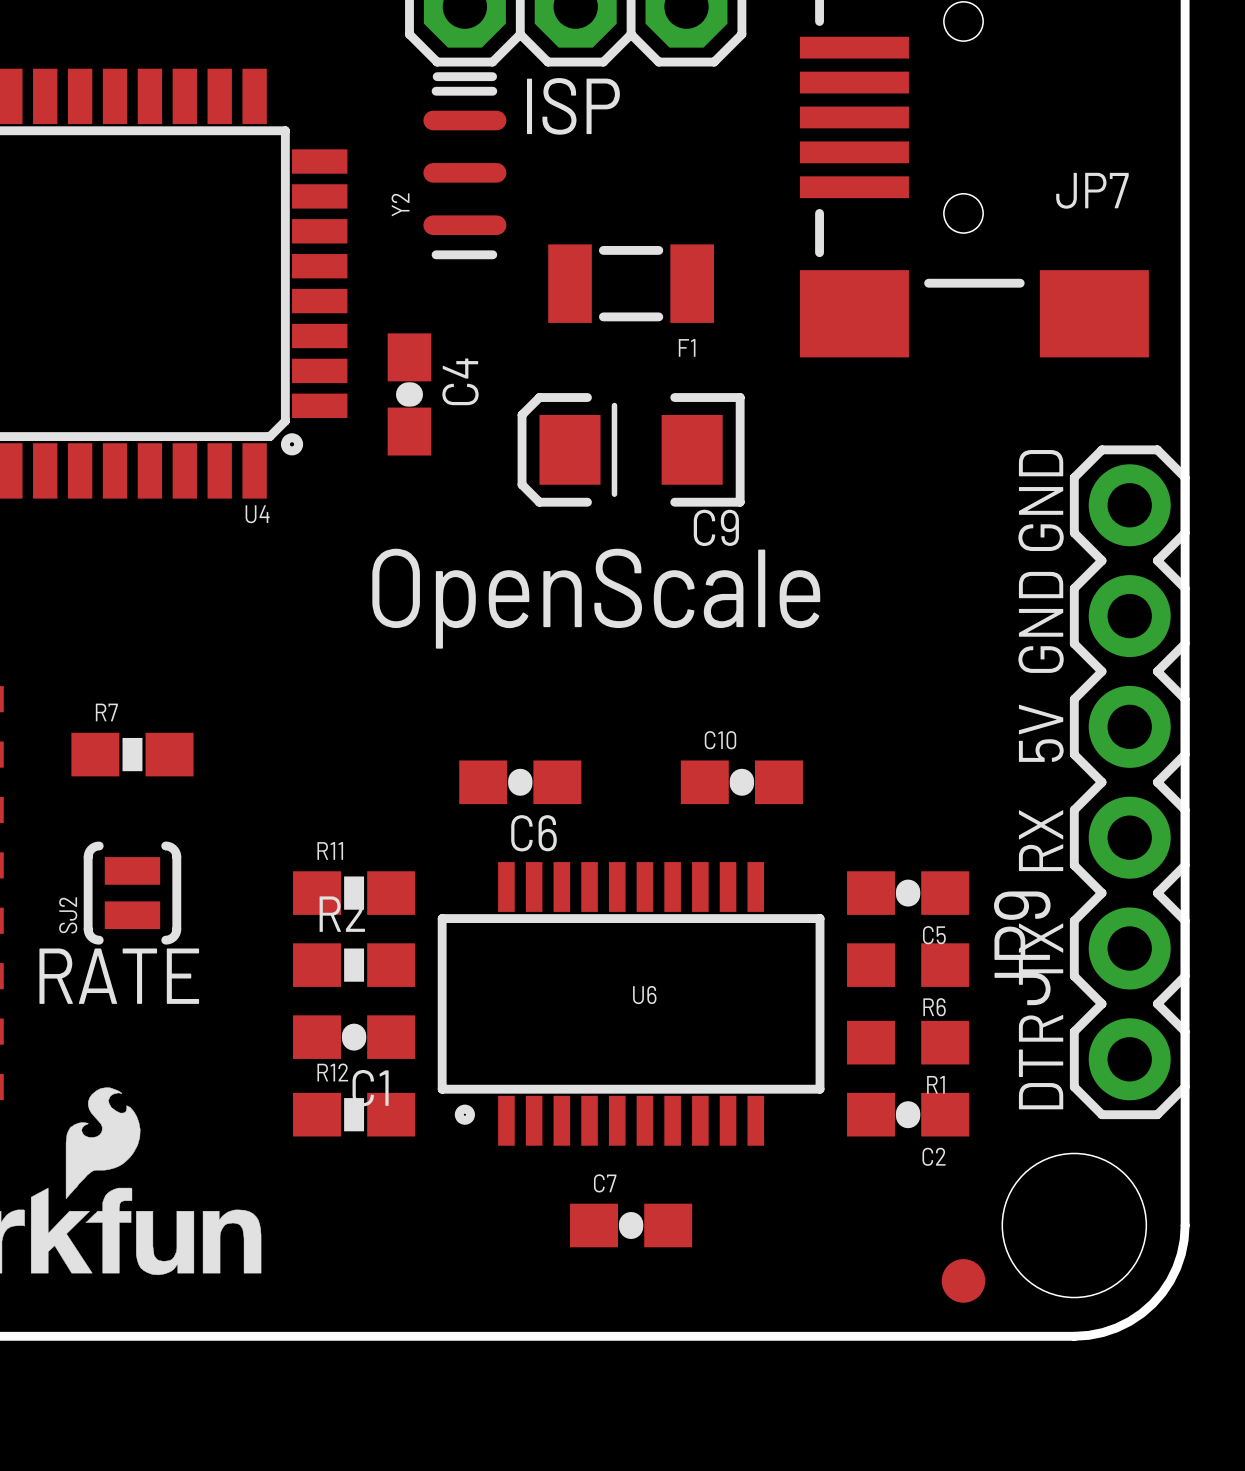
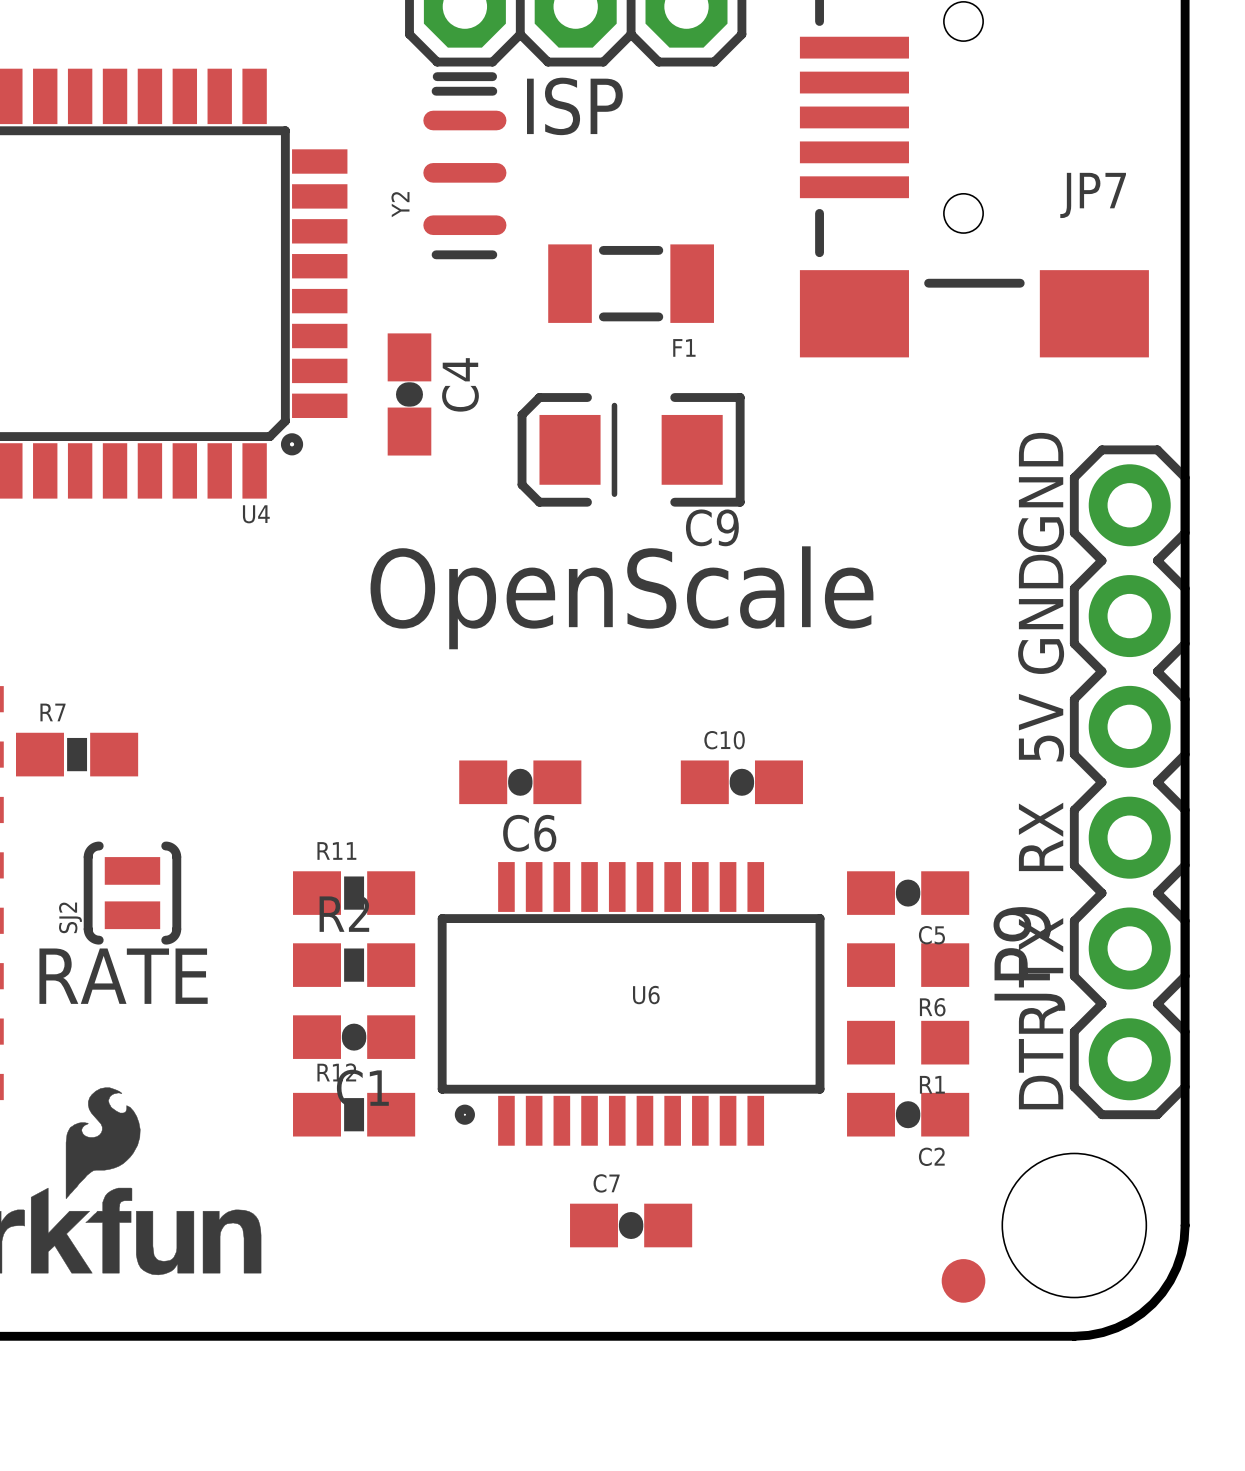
R7 position: (132, 754) -> (77, 754)

